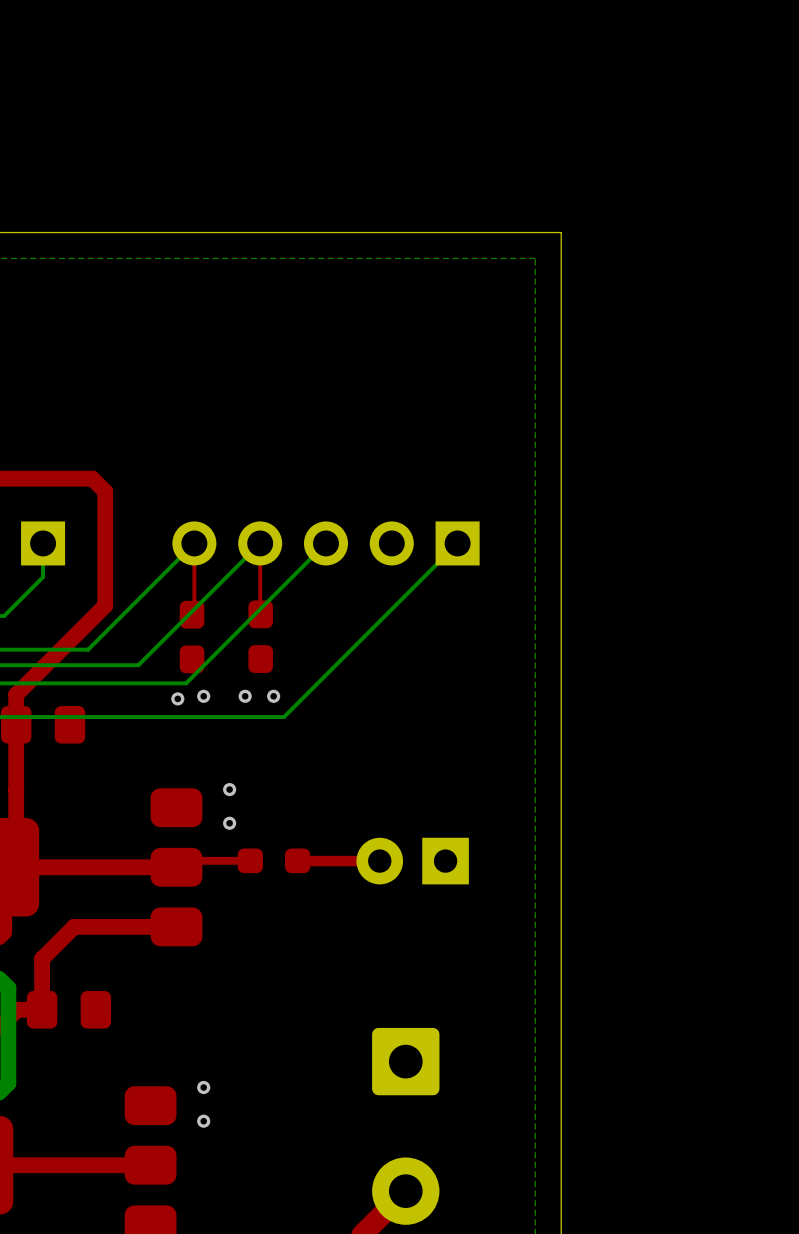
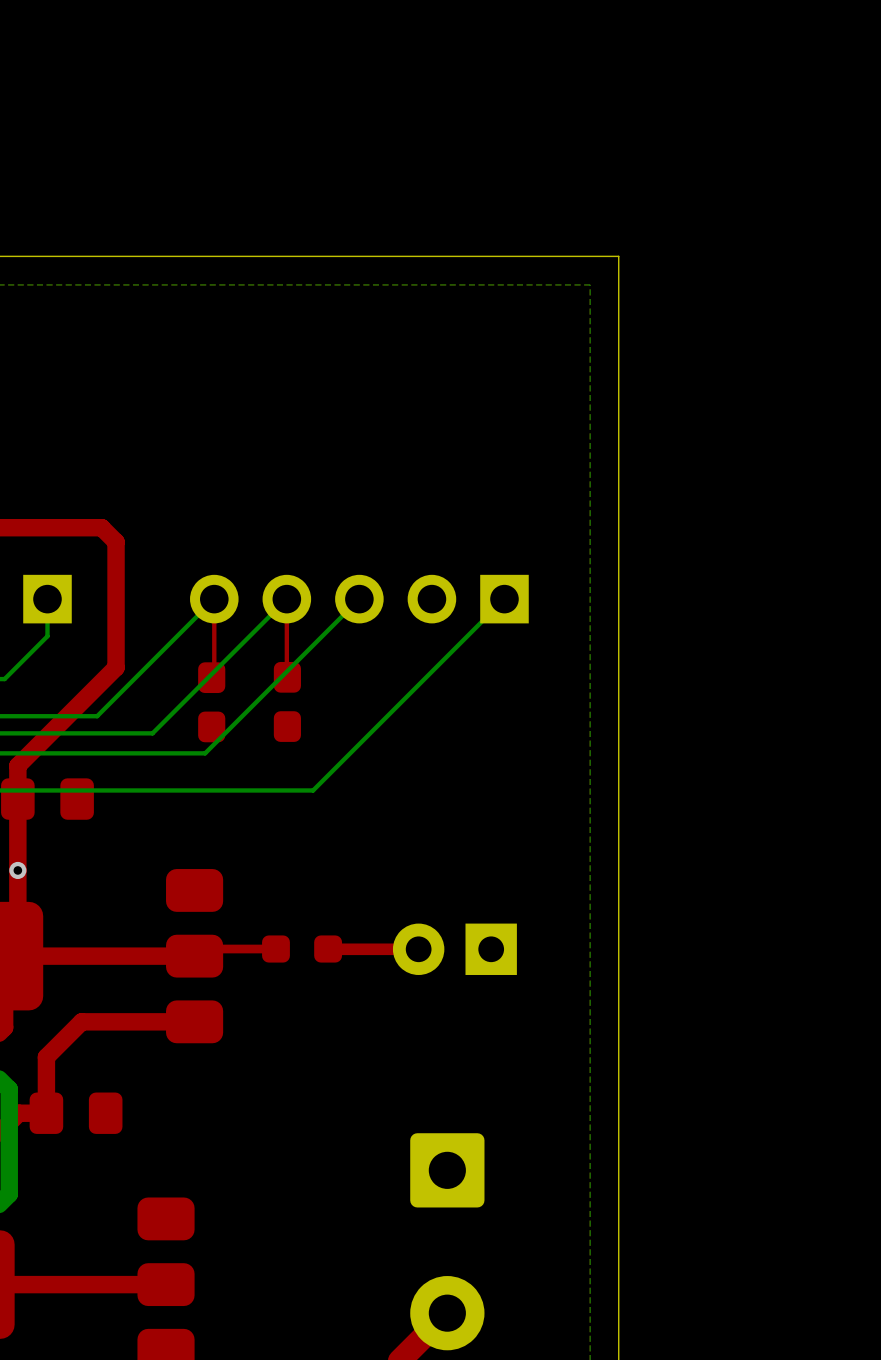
via: (203, 696) -> none
via: (245, 696) -> none
via: (273, 696) -> none
via: (177, 698) -> none
via: none -> (17, 870)
via: (229, 789) -> none
via: (229, 823) -> none
via: (203, 1087) -> none
via: (203, 1121) -> none

